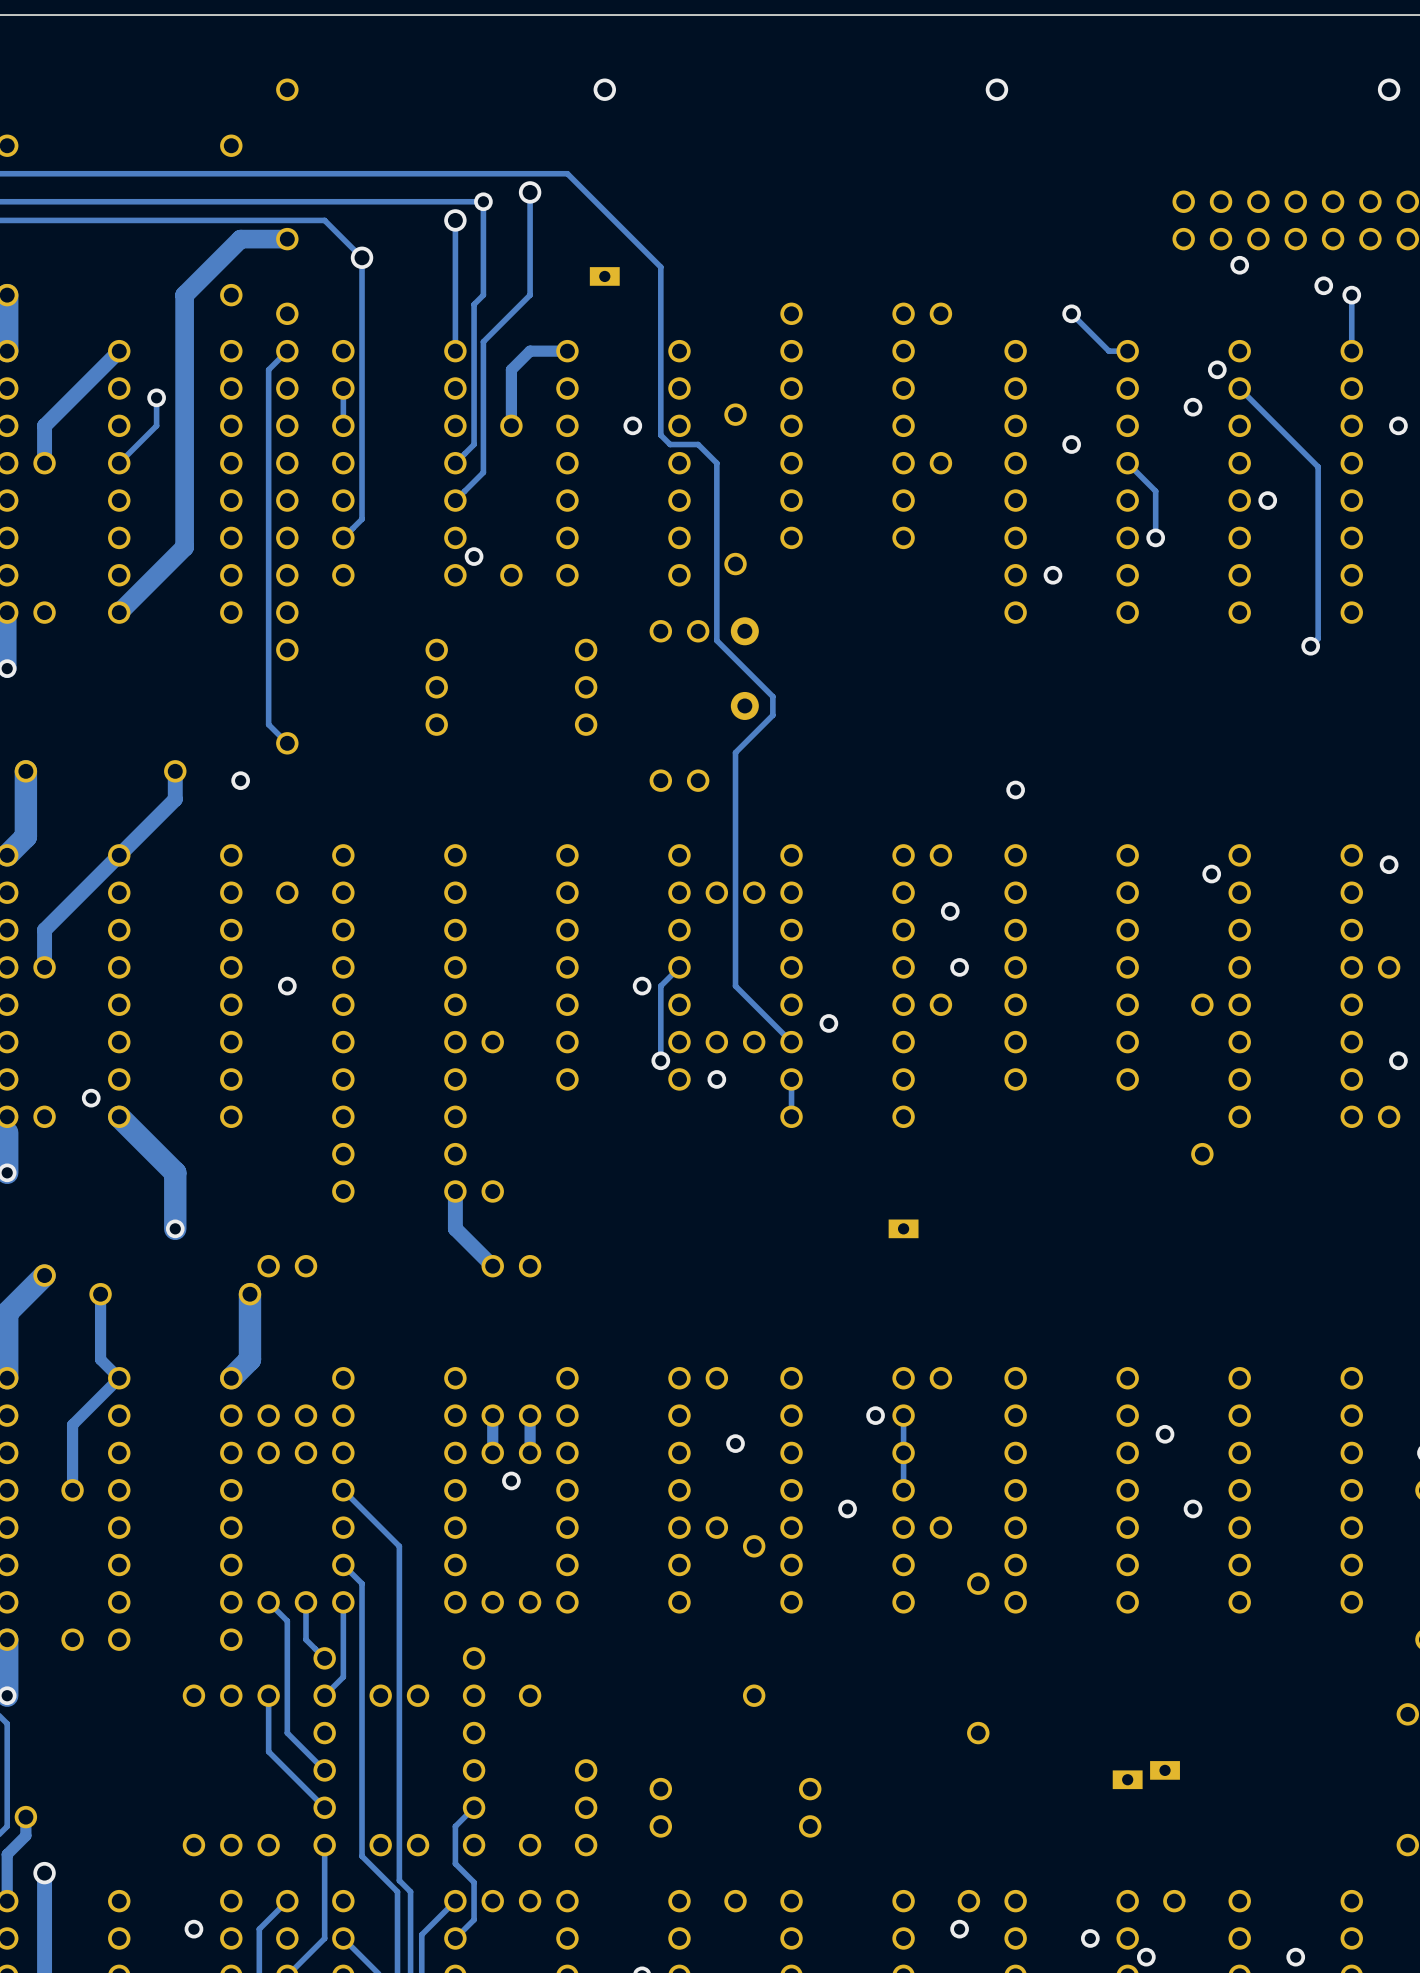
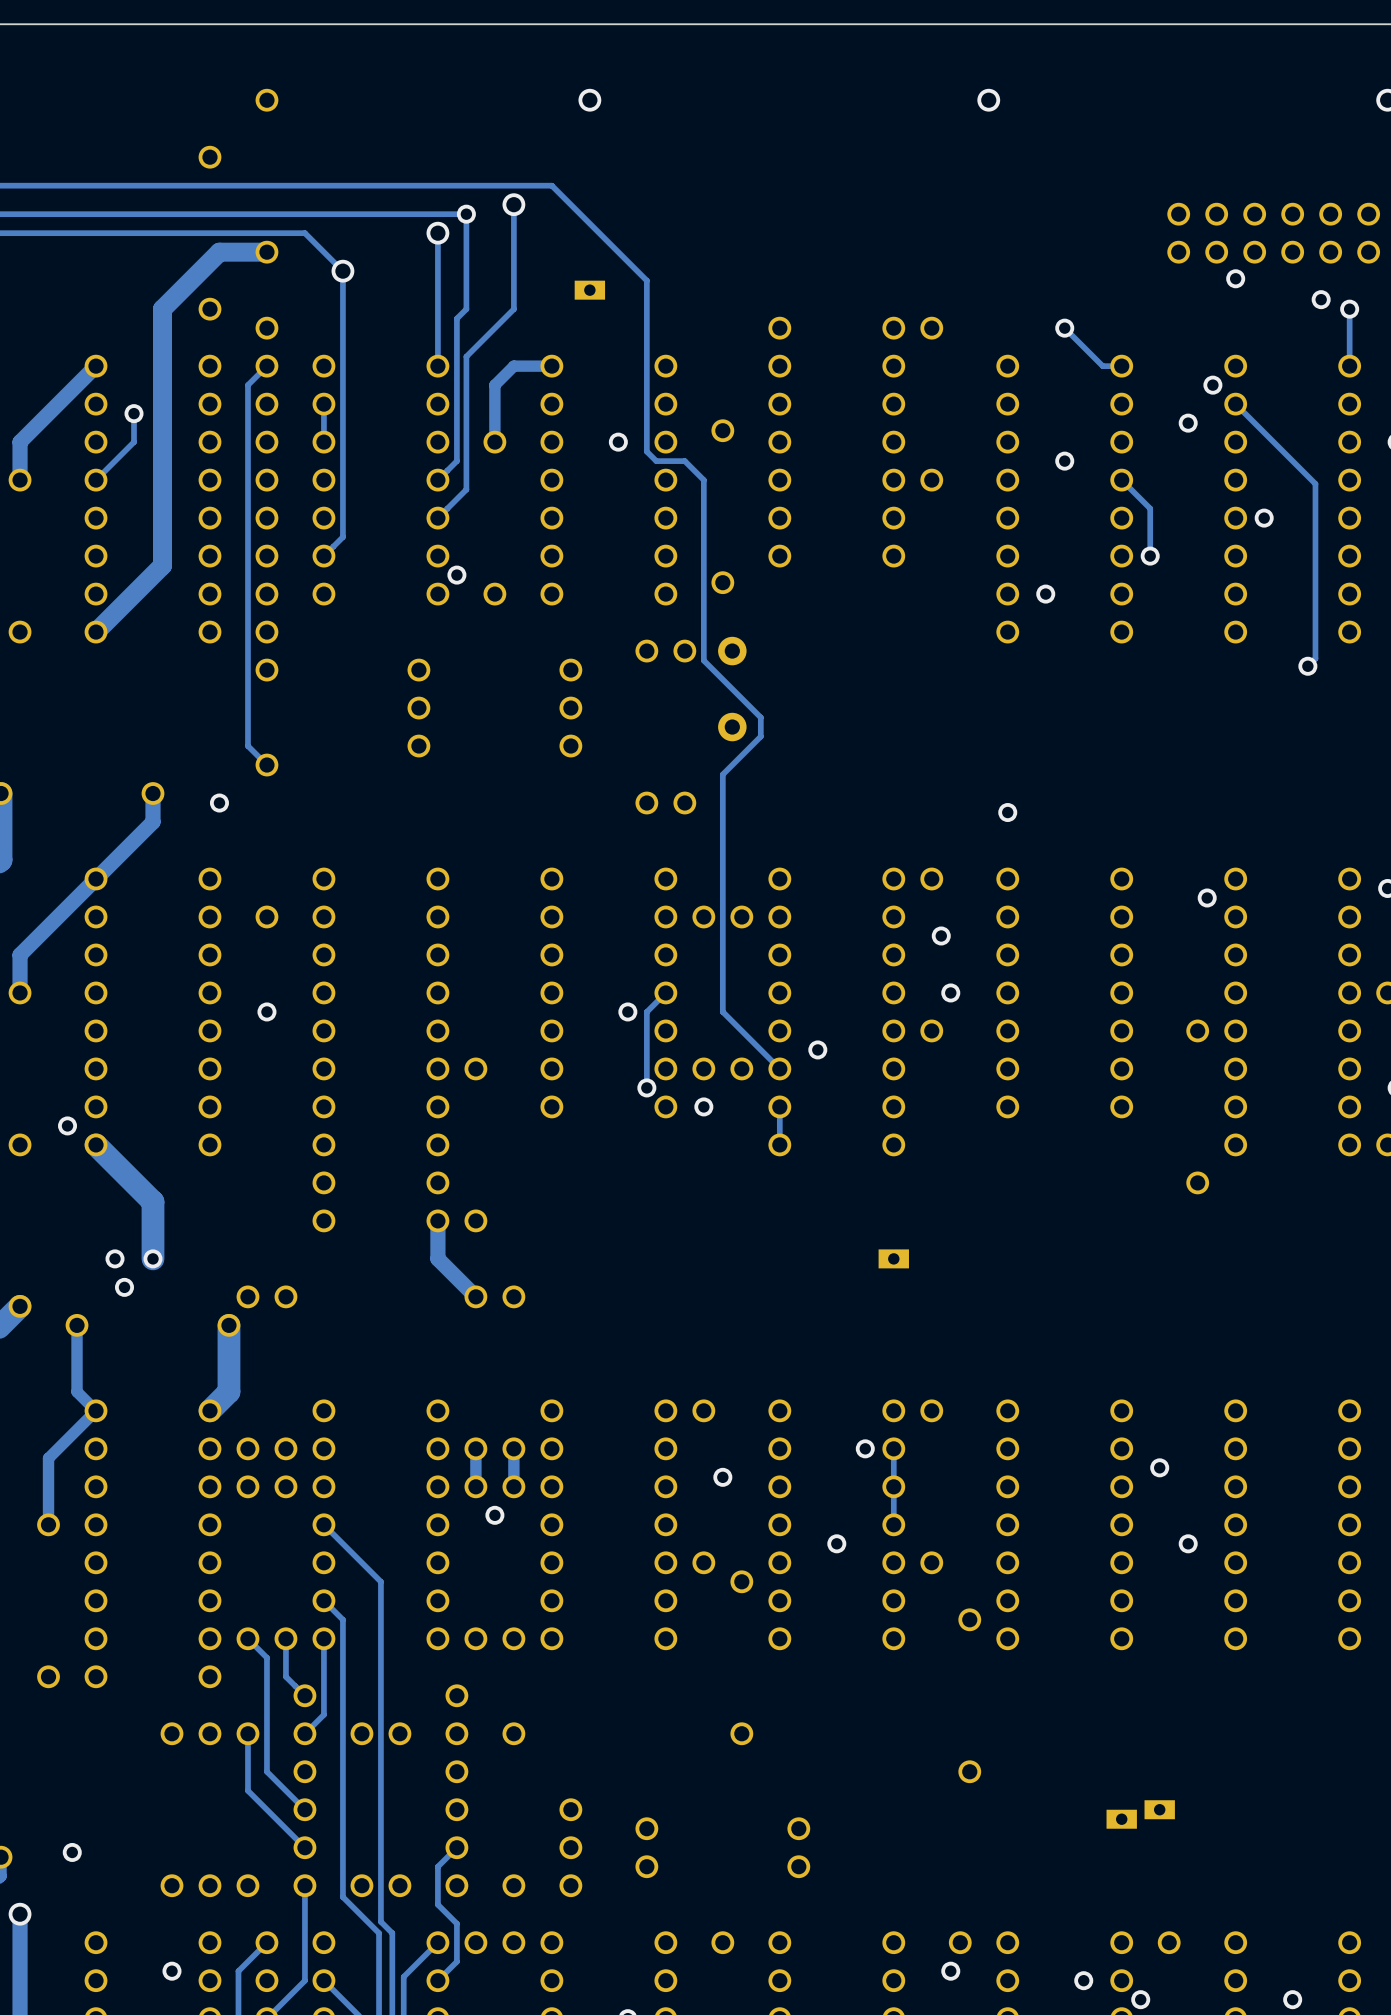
via: none -> (115, 1258)
via: none -> (124, 1287)
via: none -> (72, 1852)

